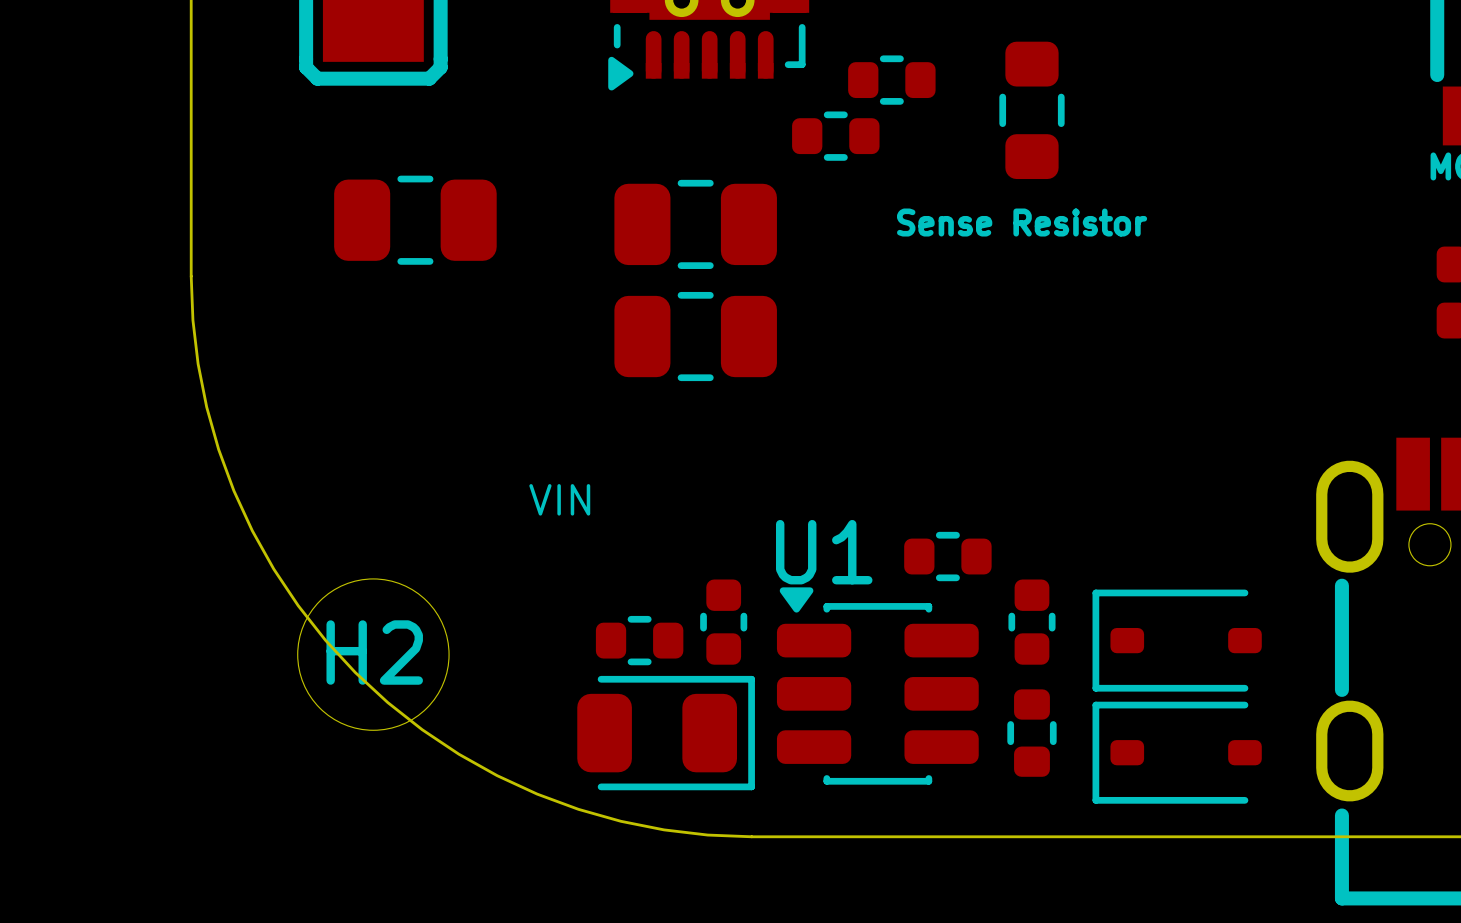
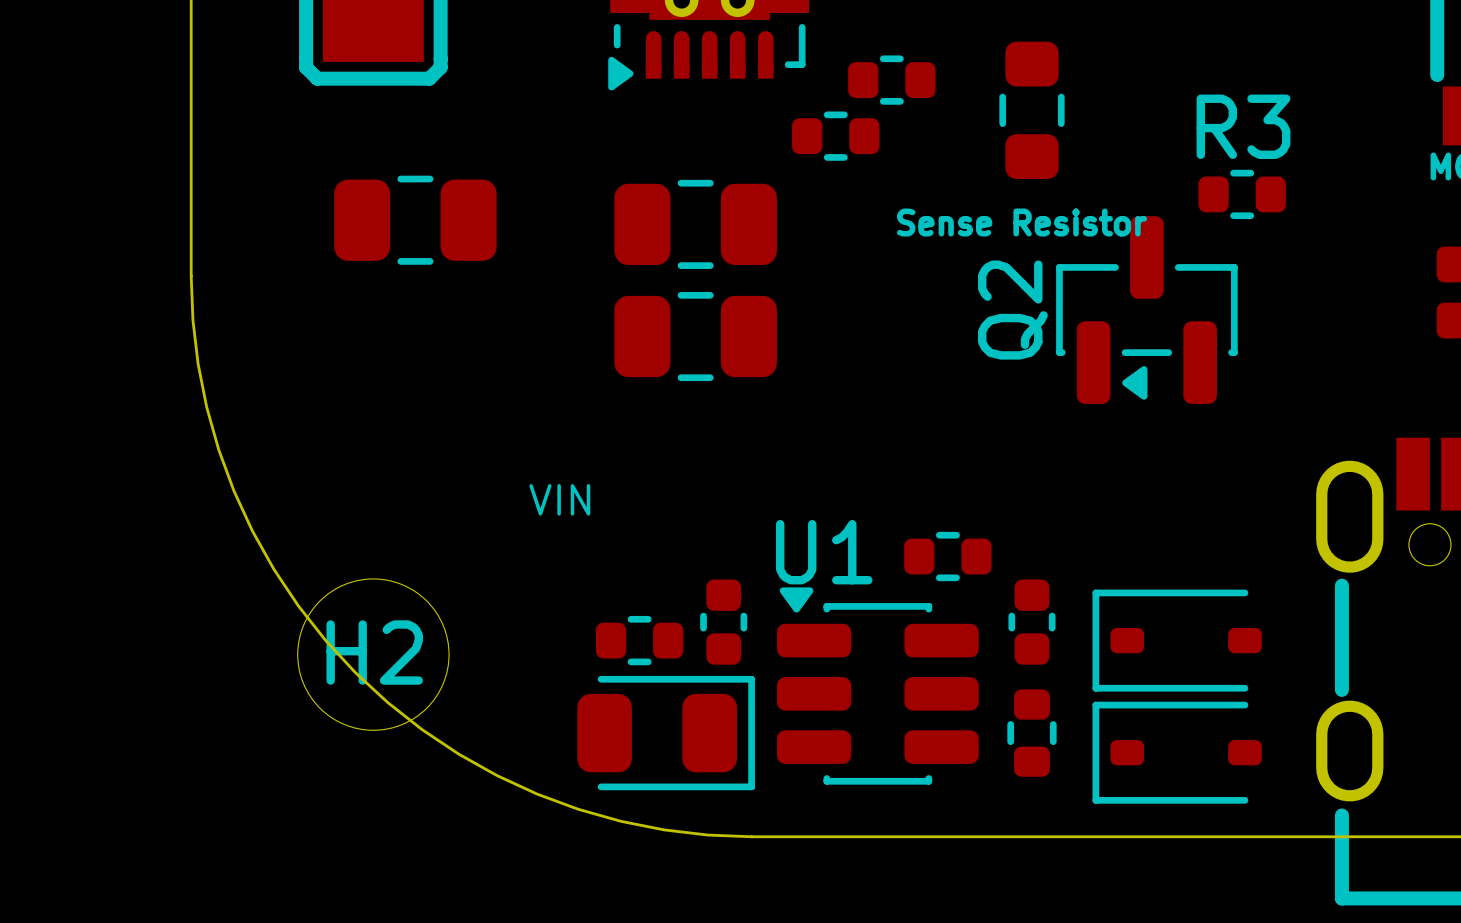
R3: none -> (1242, 194)
Q2: none -> (1146, 310)

